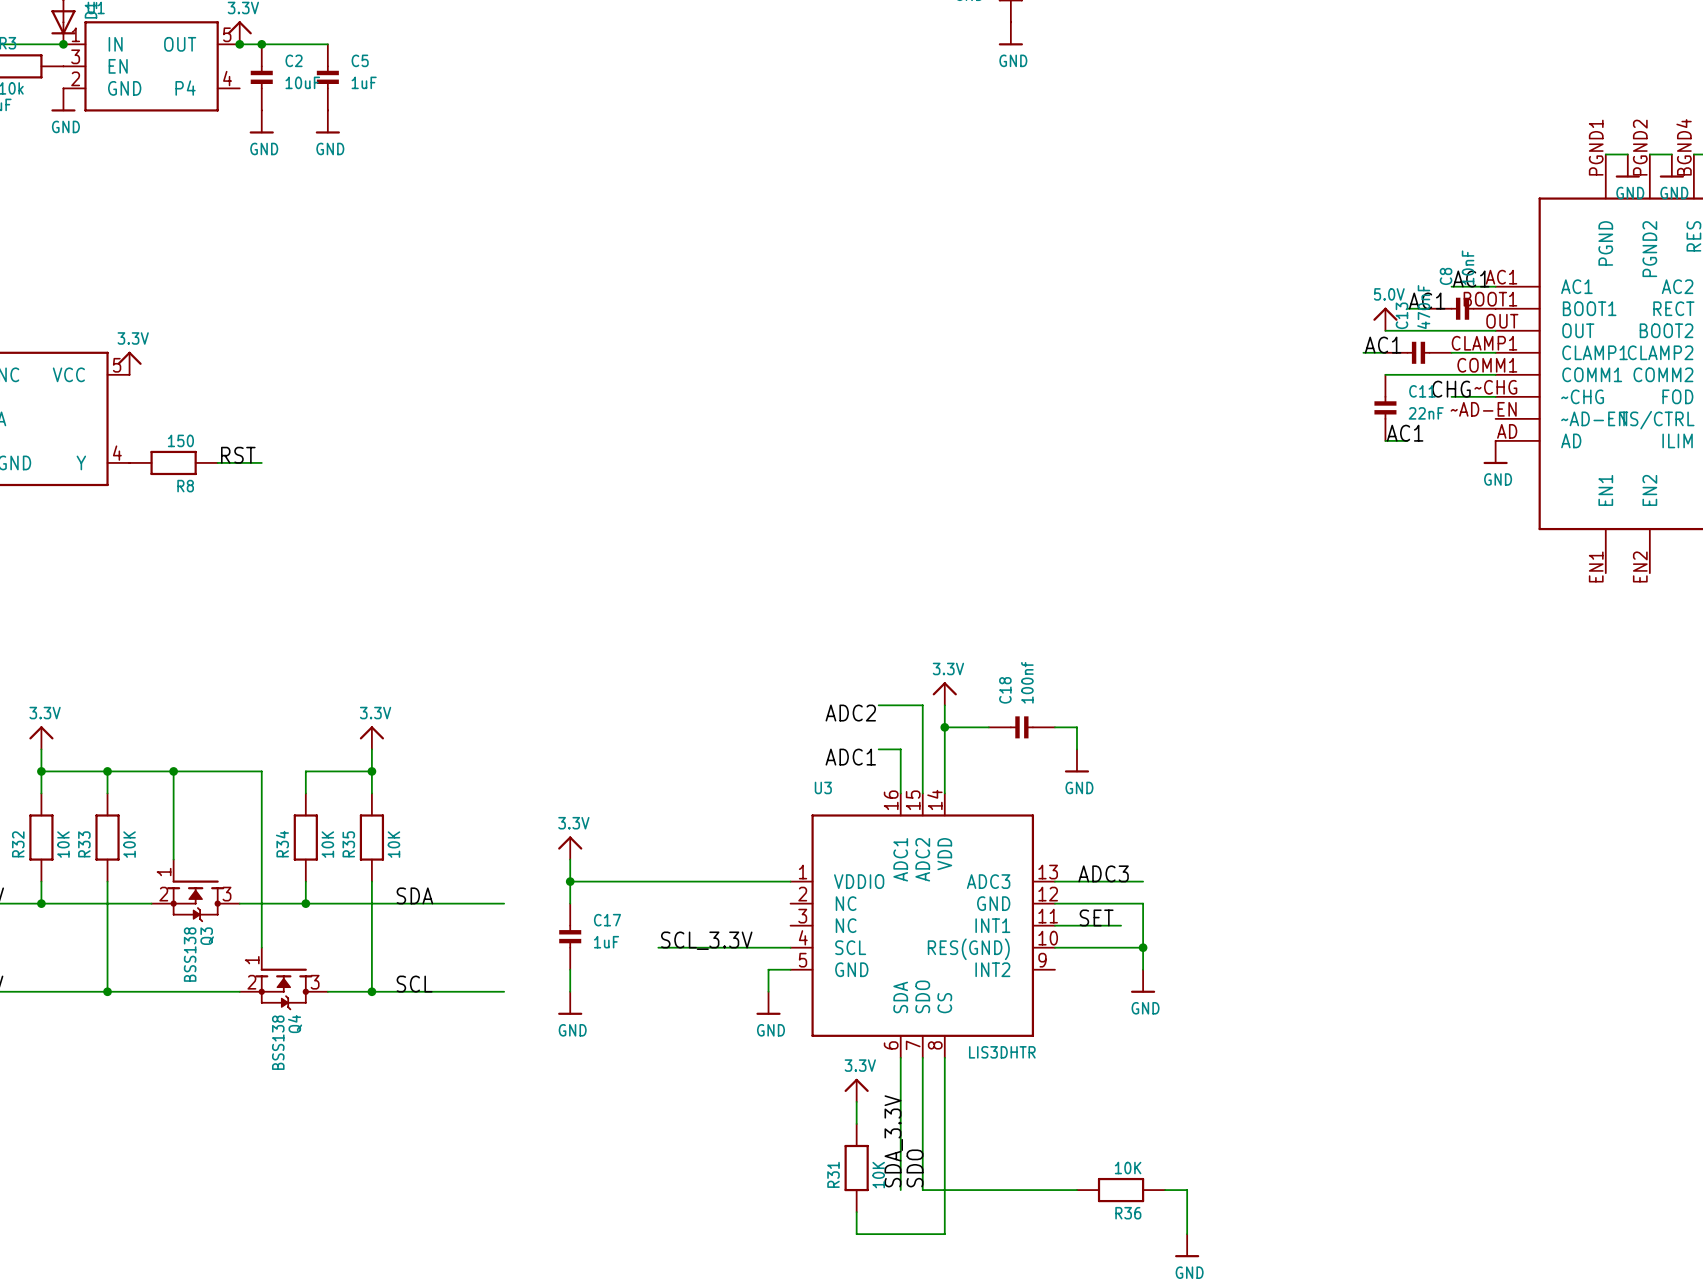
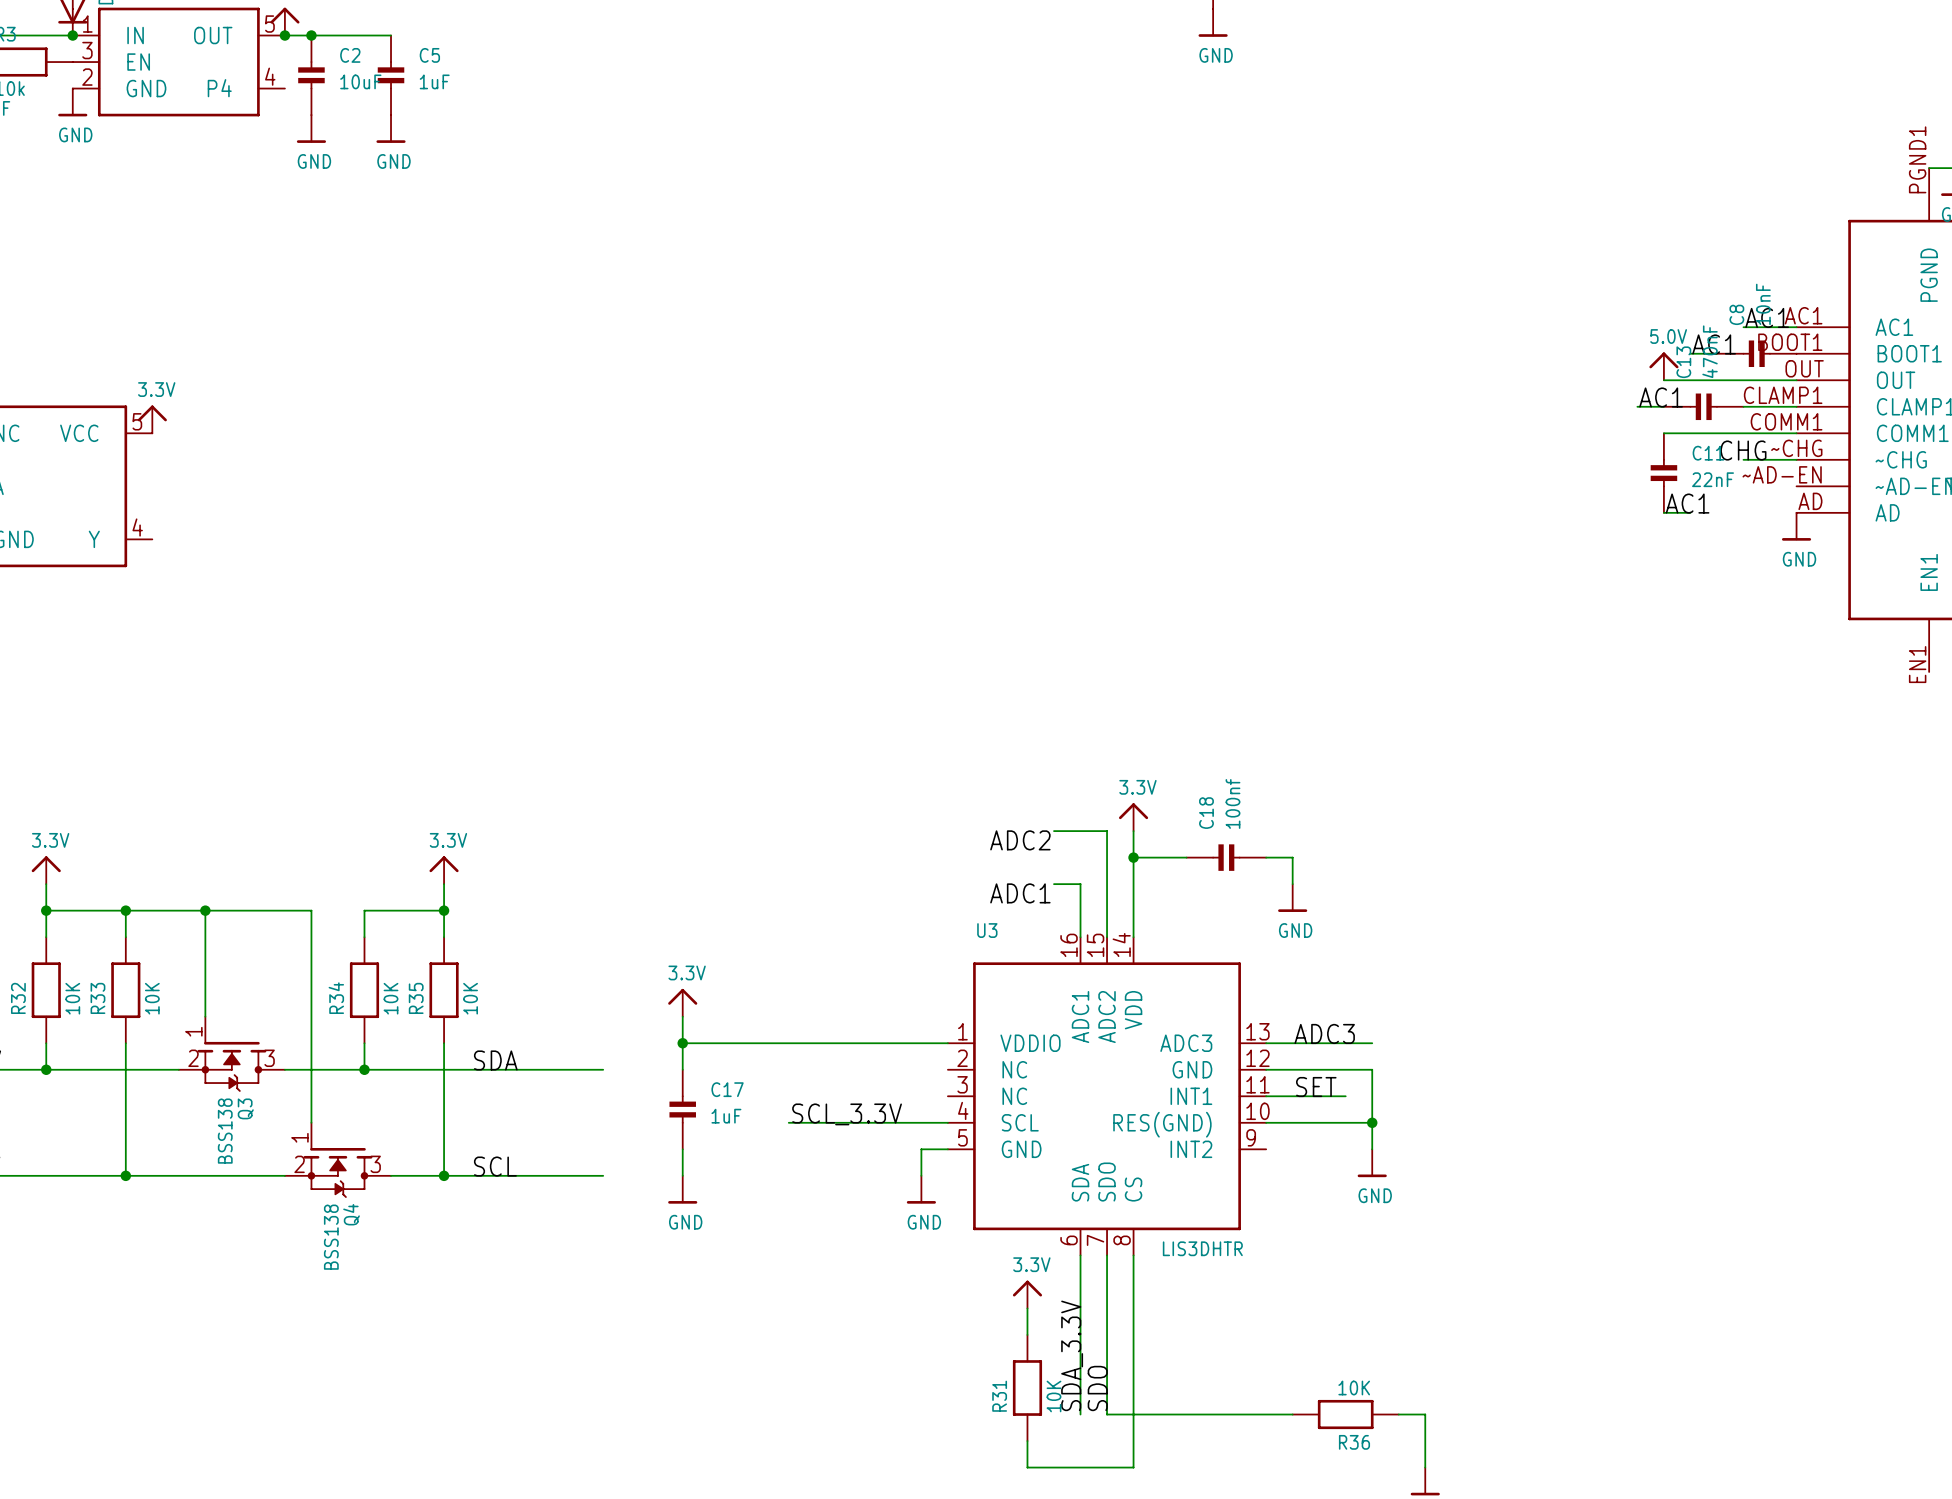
label: RST (238, 455) -> none
R8: 150 (173, 462) -> none
wire: (217, 462) (261, 462) -> none

